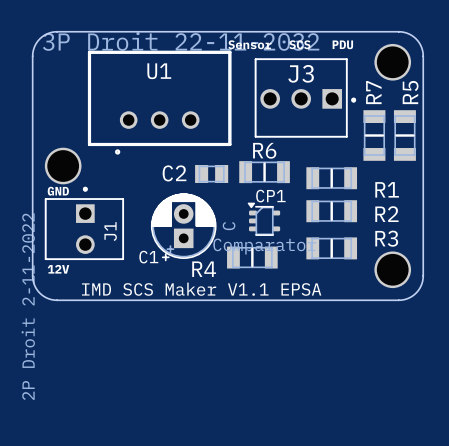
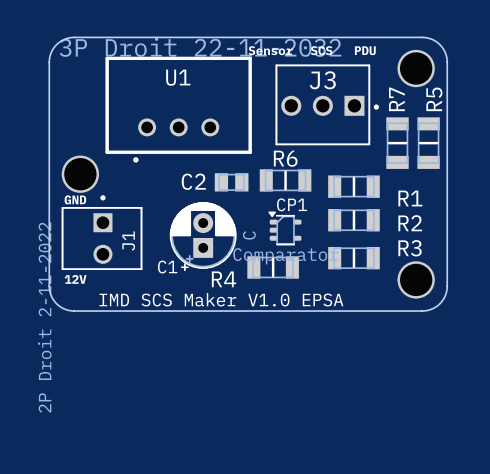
text: IMD SCS Maker V1.1 EPSA (201, 289) -> IMD SCS Maker V1.0 EPSA (221, 299)

